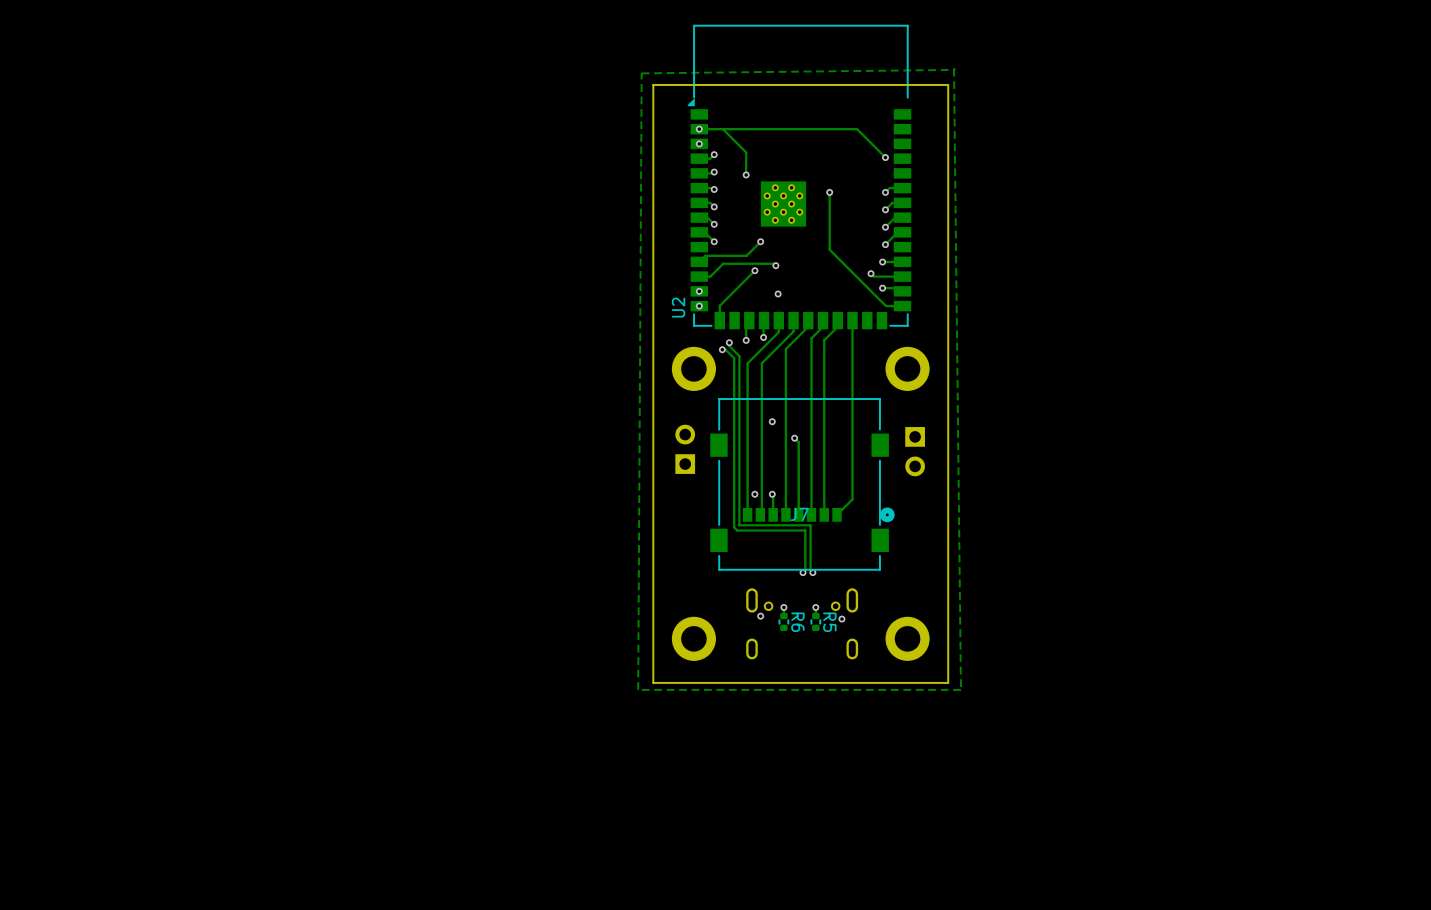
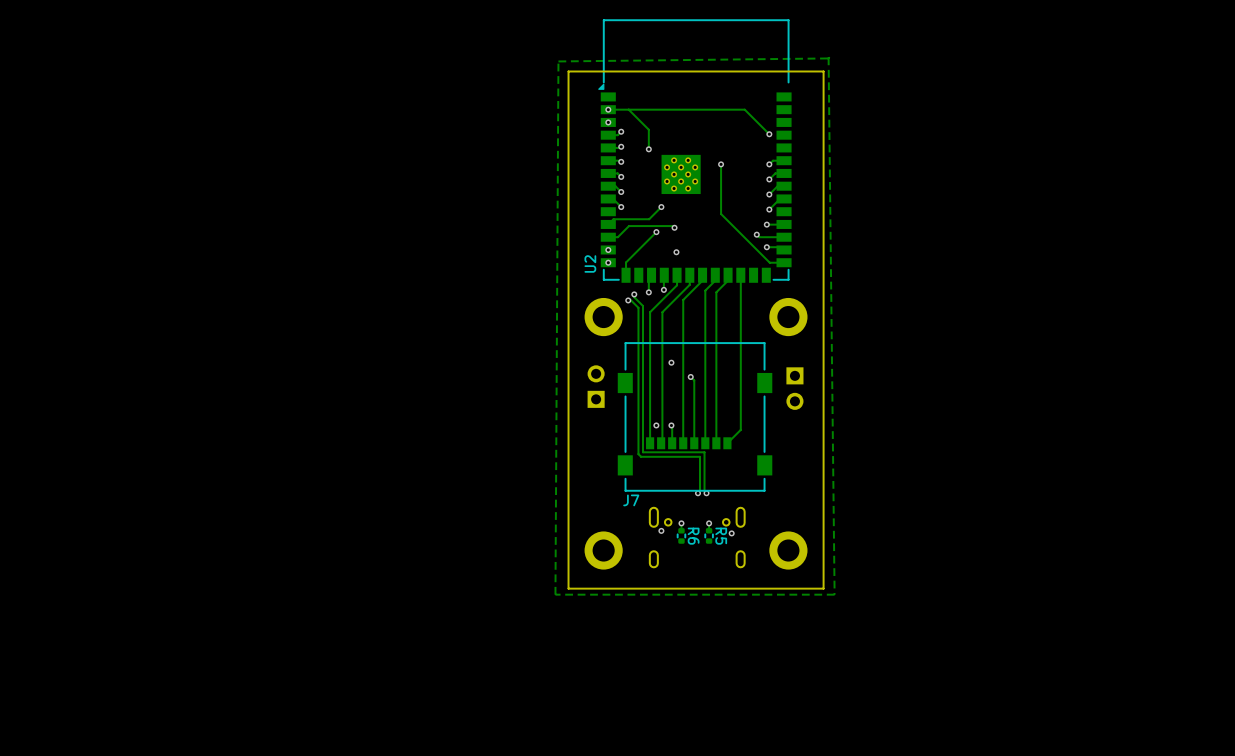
J7 footprint: [710, 398, 895, 571] -> [617, 342, 773, 492]
J7 name position: J7 (799, 514) -> J7 (631, 500)

